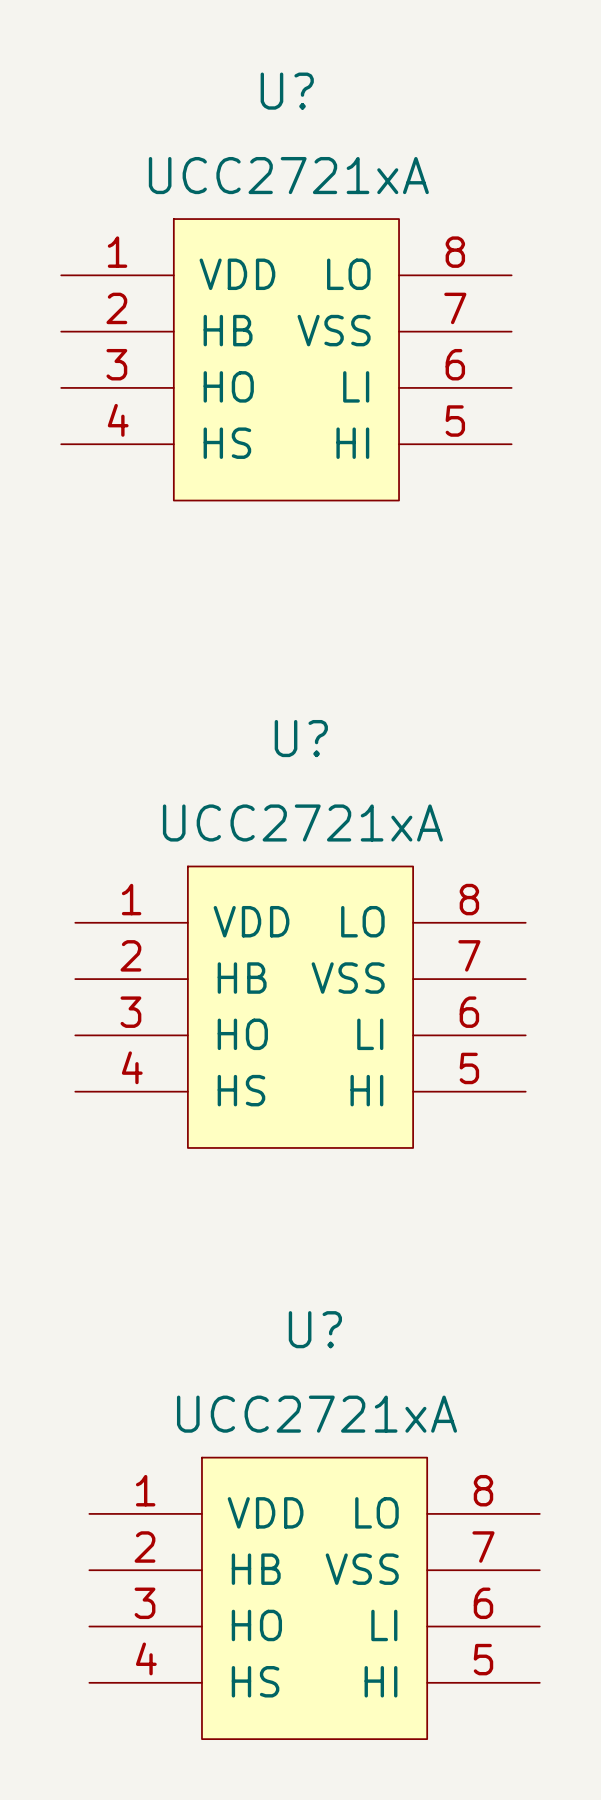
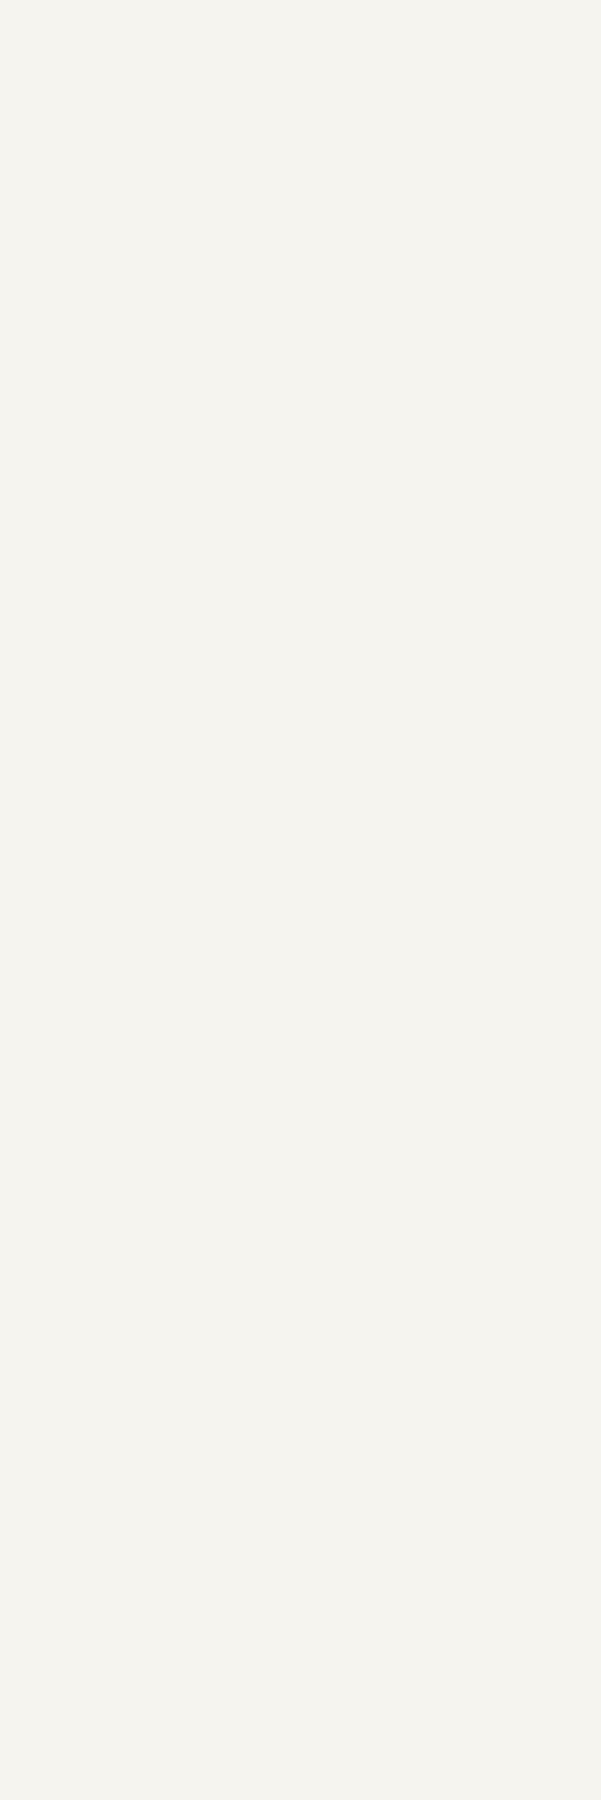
U?: UCC2721xA (286, 359) -> none
U?: UCC2721xA (300, 1007) -> none
U?: UCC2721xA (314, 1598) -> none

